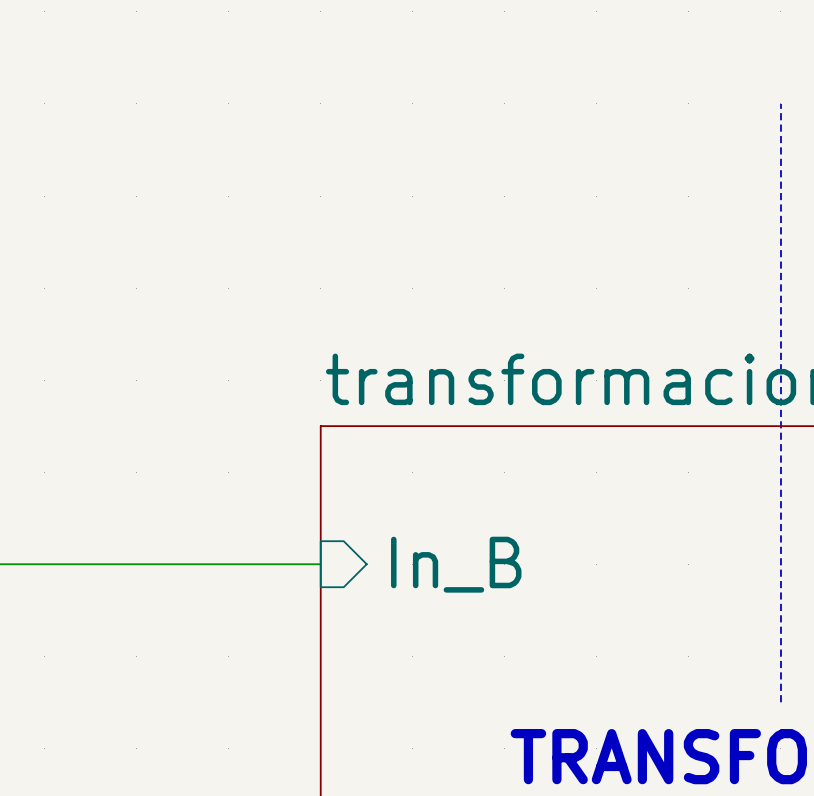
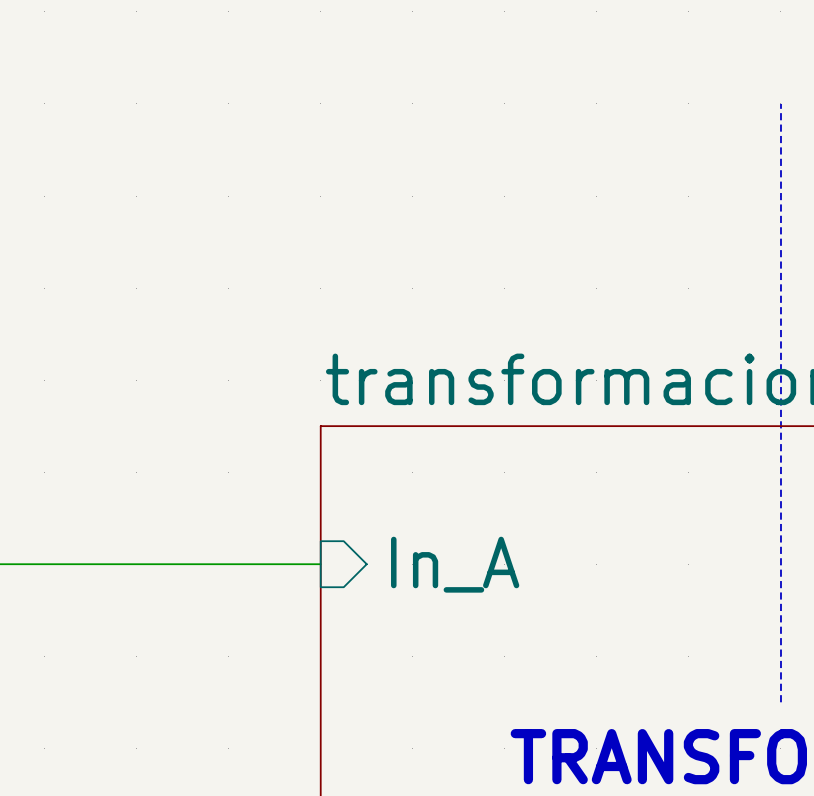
sheet pin: In_B (456, 564) -> In_A (455, 564)

